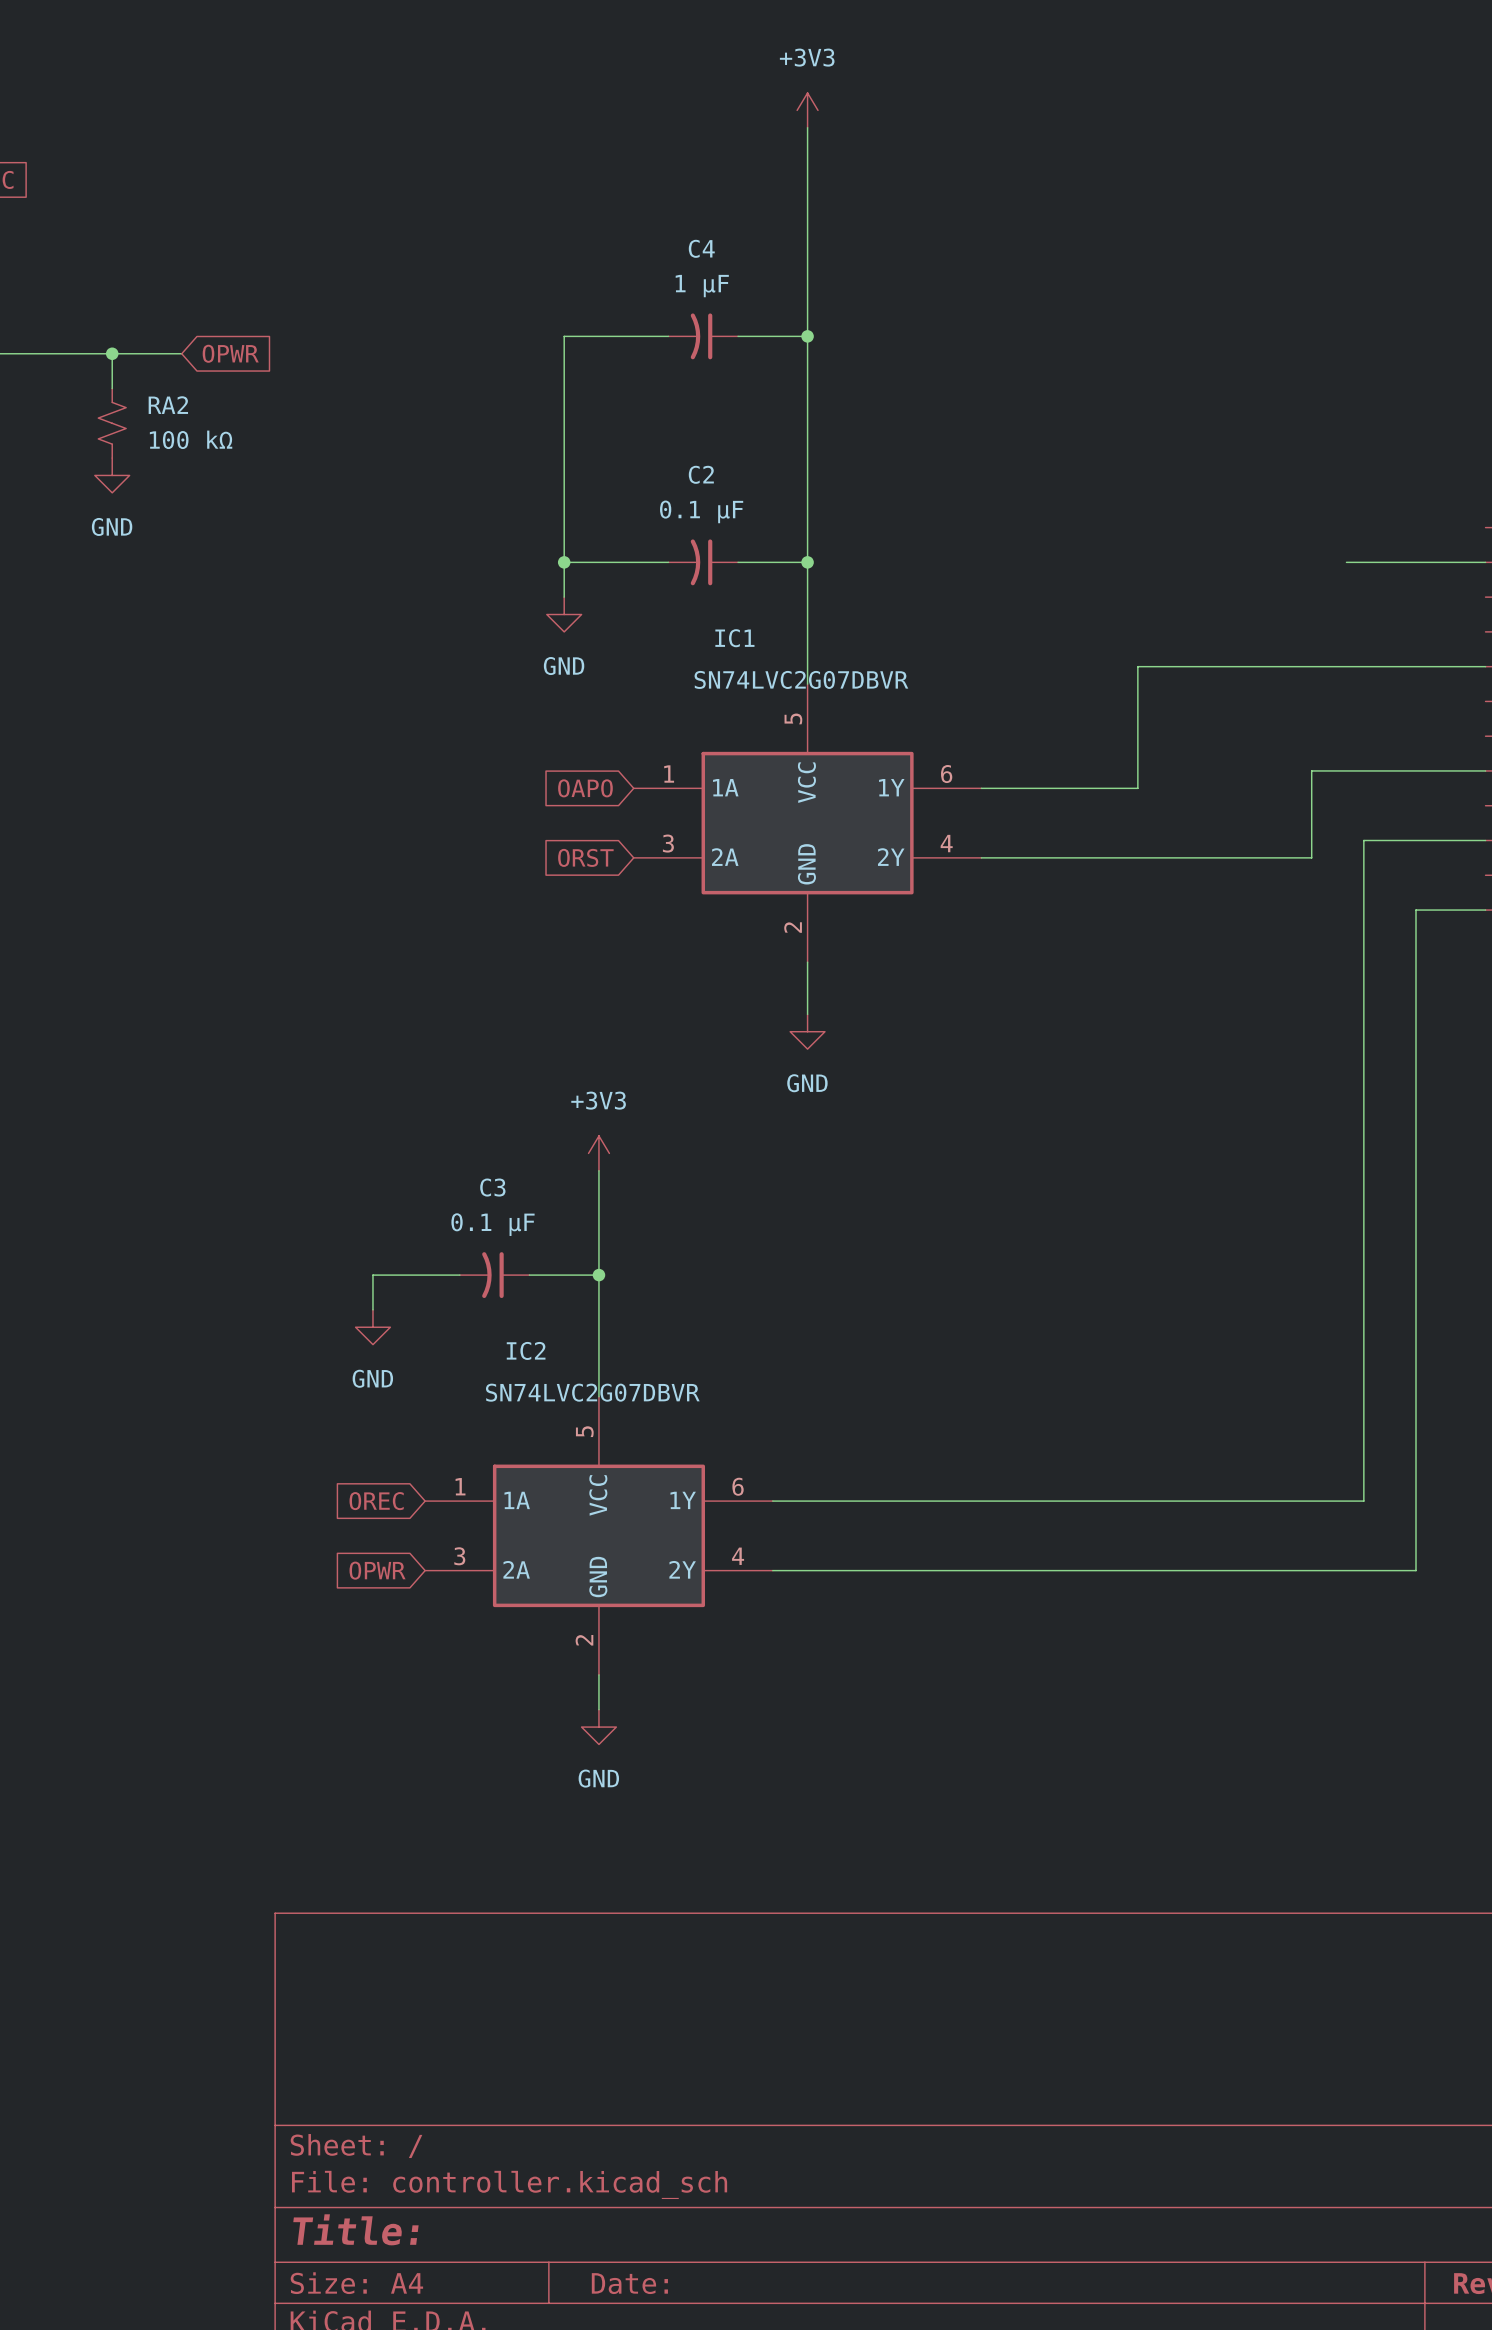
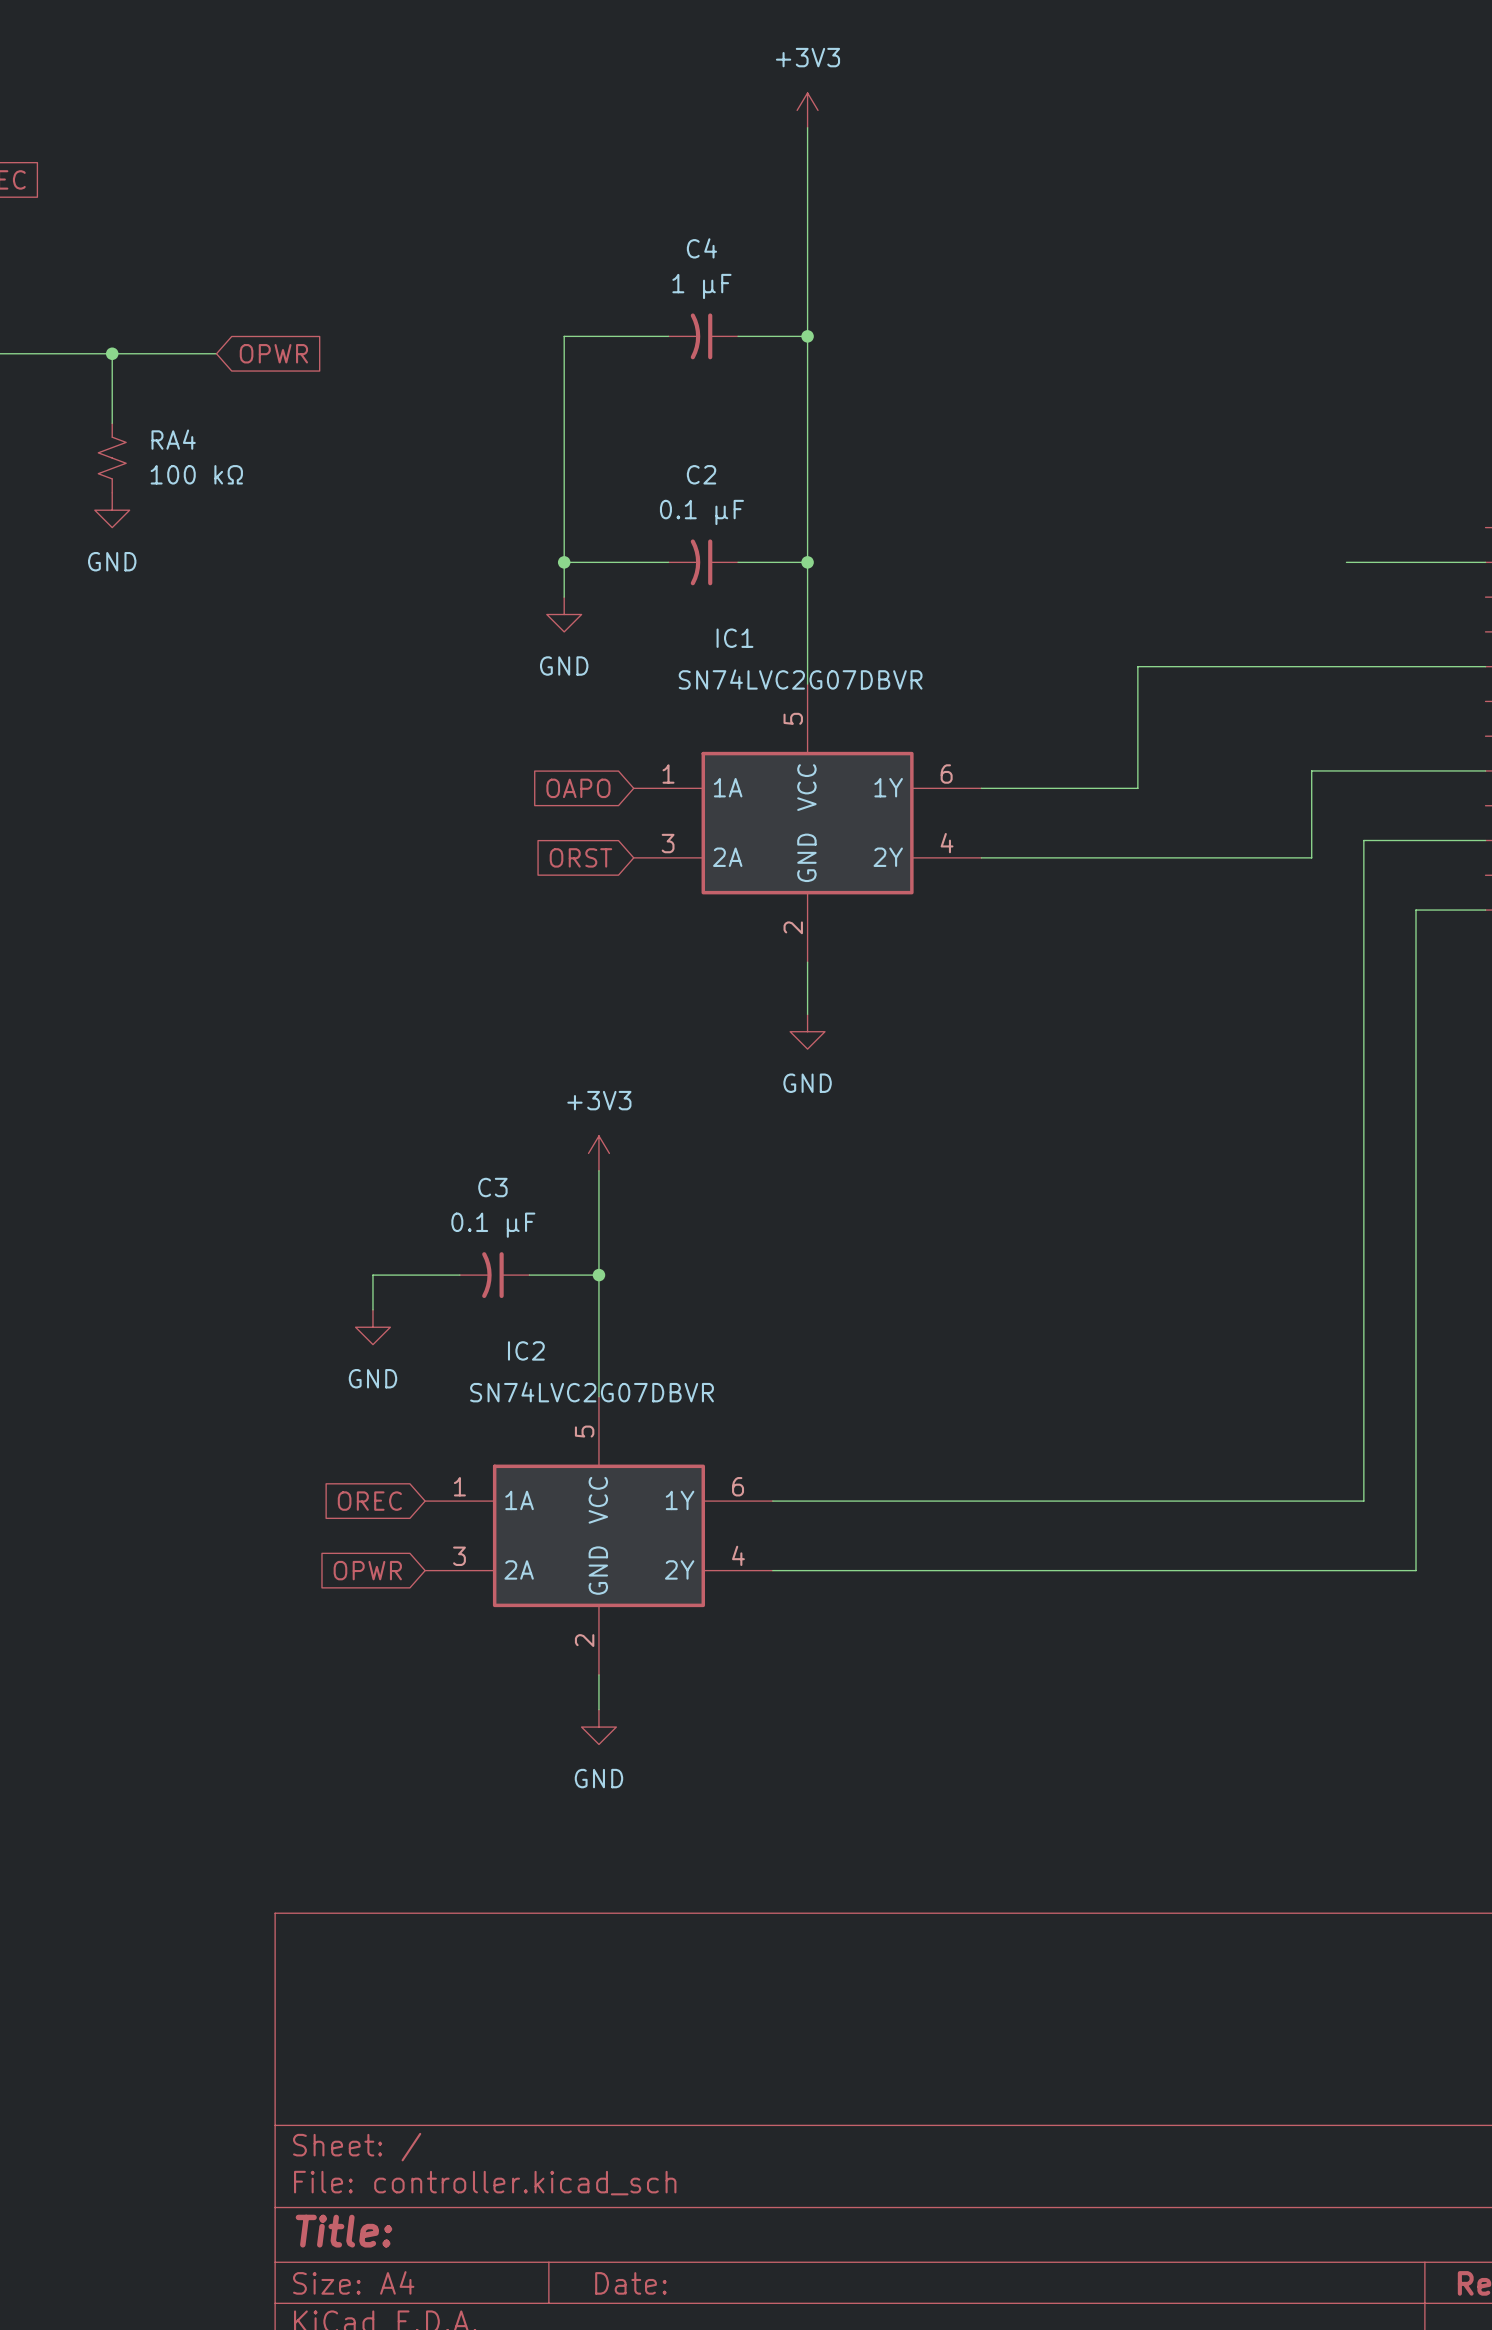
wire: none -> (181, 353) (216, 353)
global label position: OPWR (230, 353) -> OPWR (273, 353)
wire: none -> (112, 388) (112, 423)
RA2: 100 kΩ (112, 423) -> none
RA4: none -> 100 kΩ (112, 458)
power symbol position: GND (112, 475) -> GND (112, 510)

